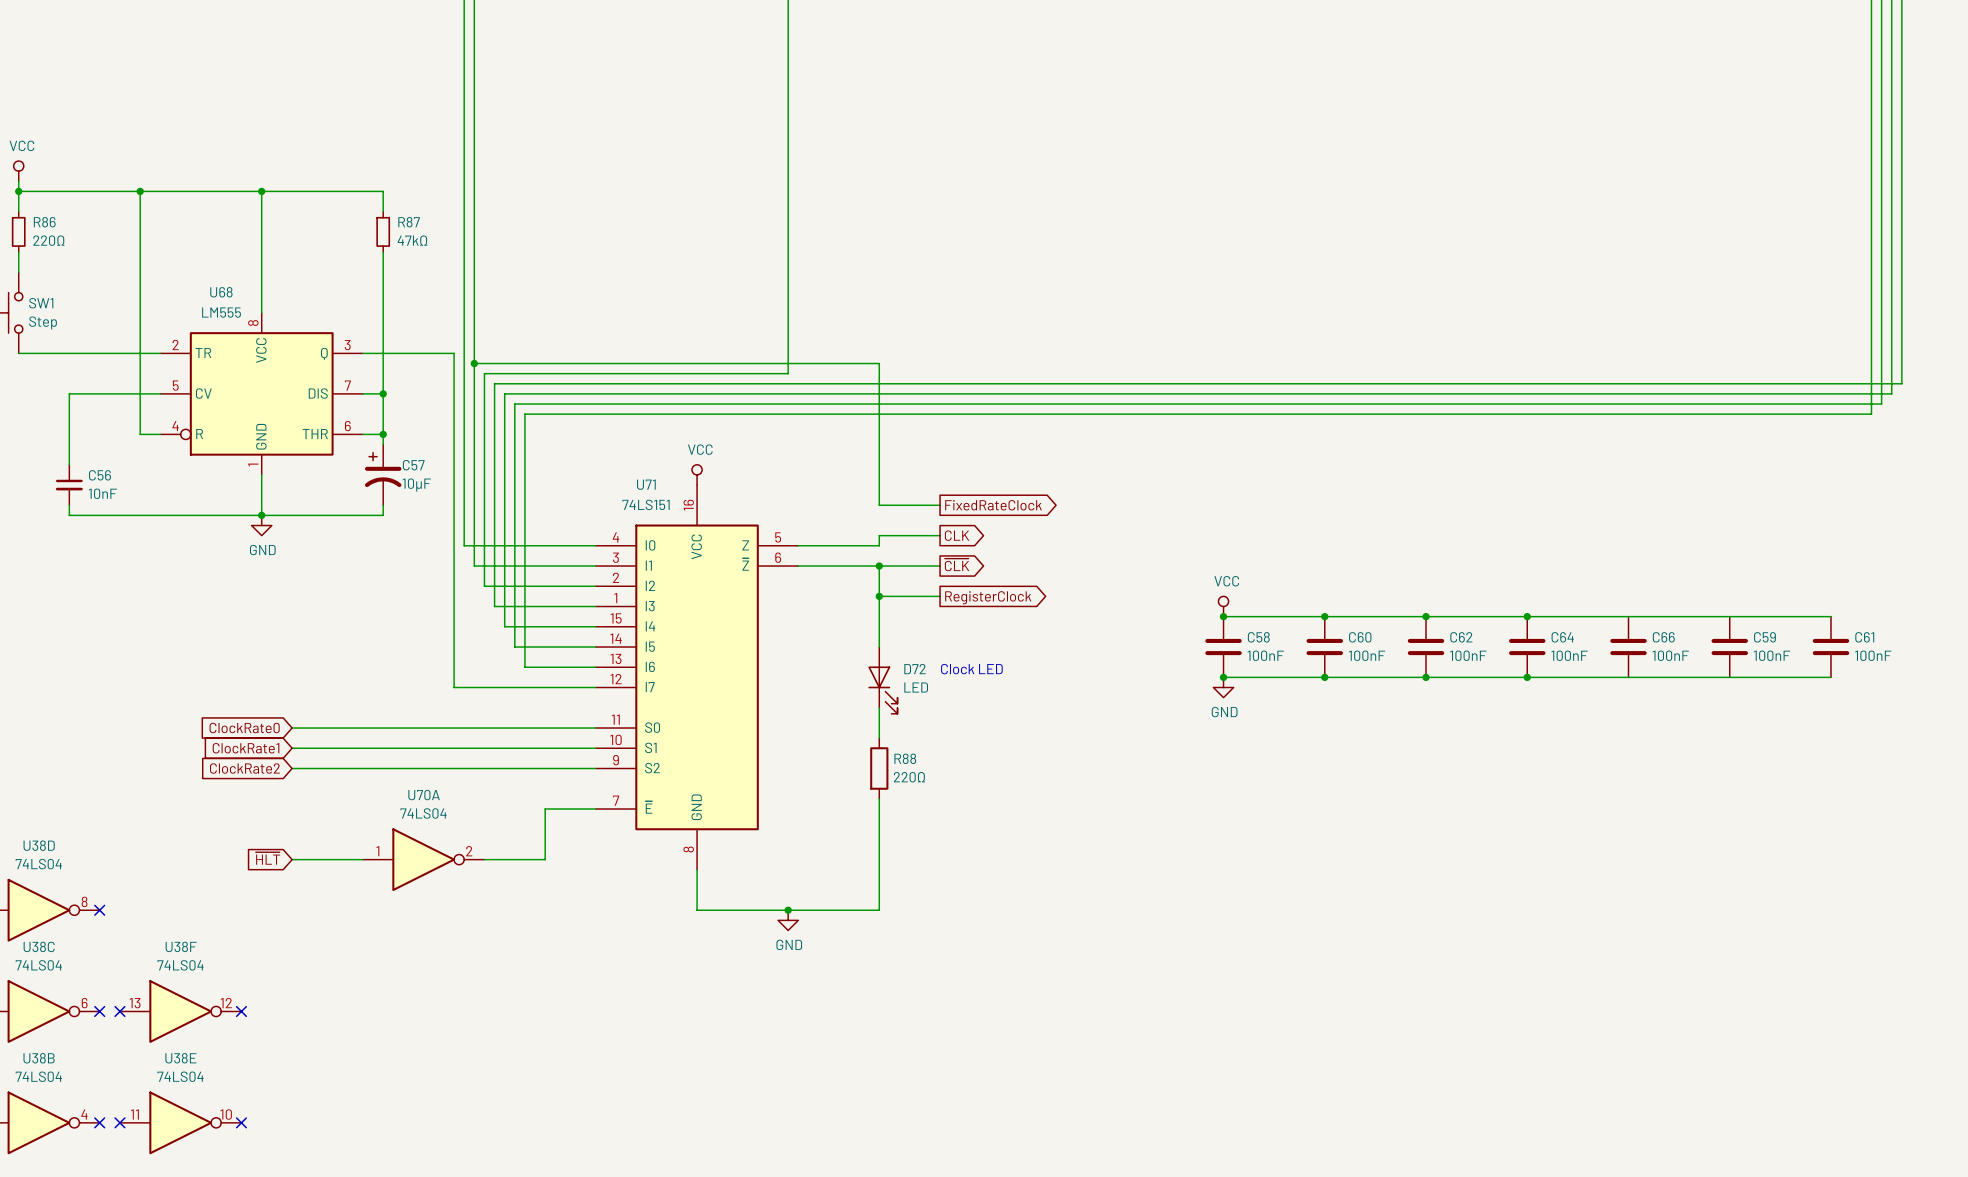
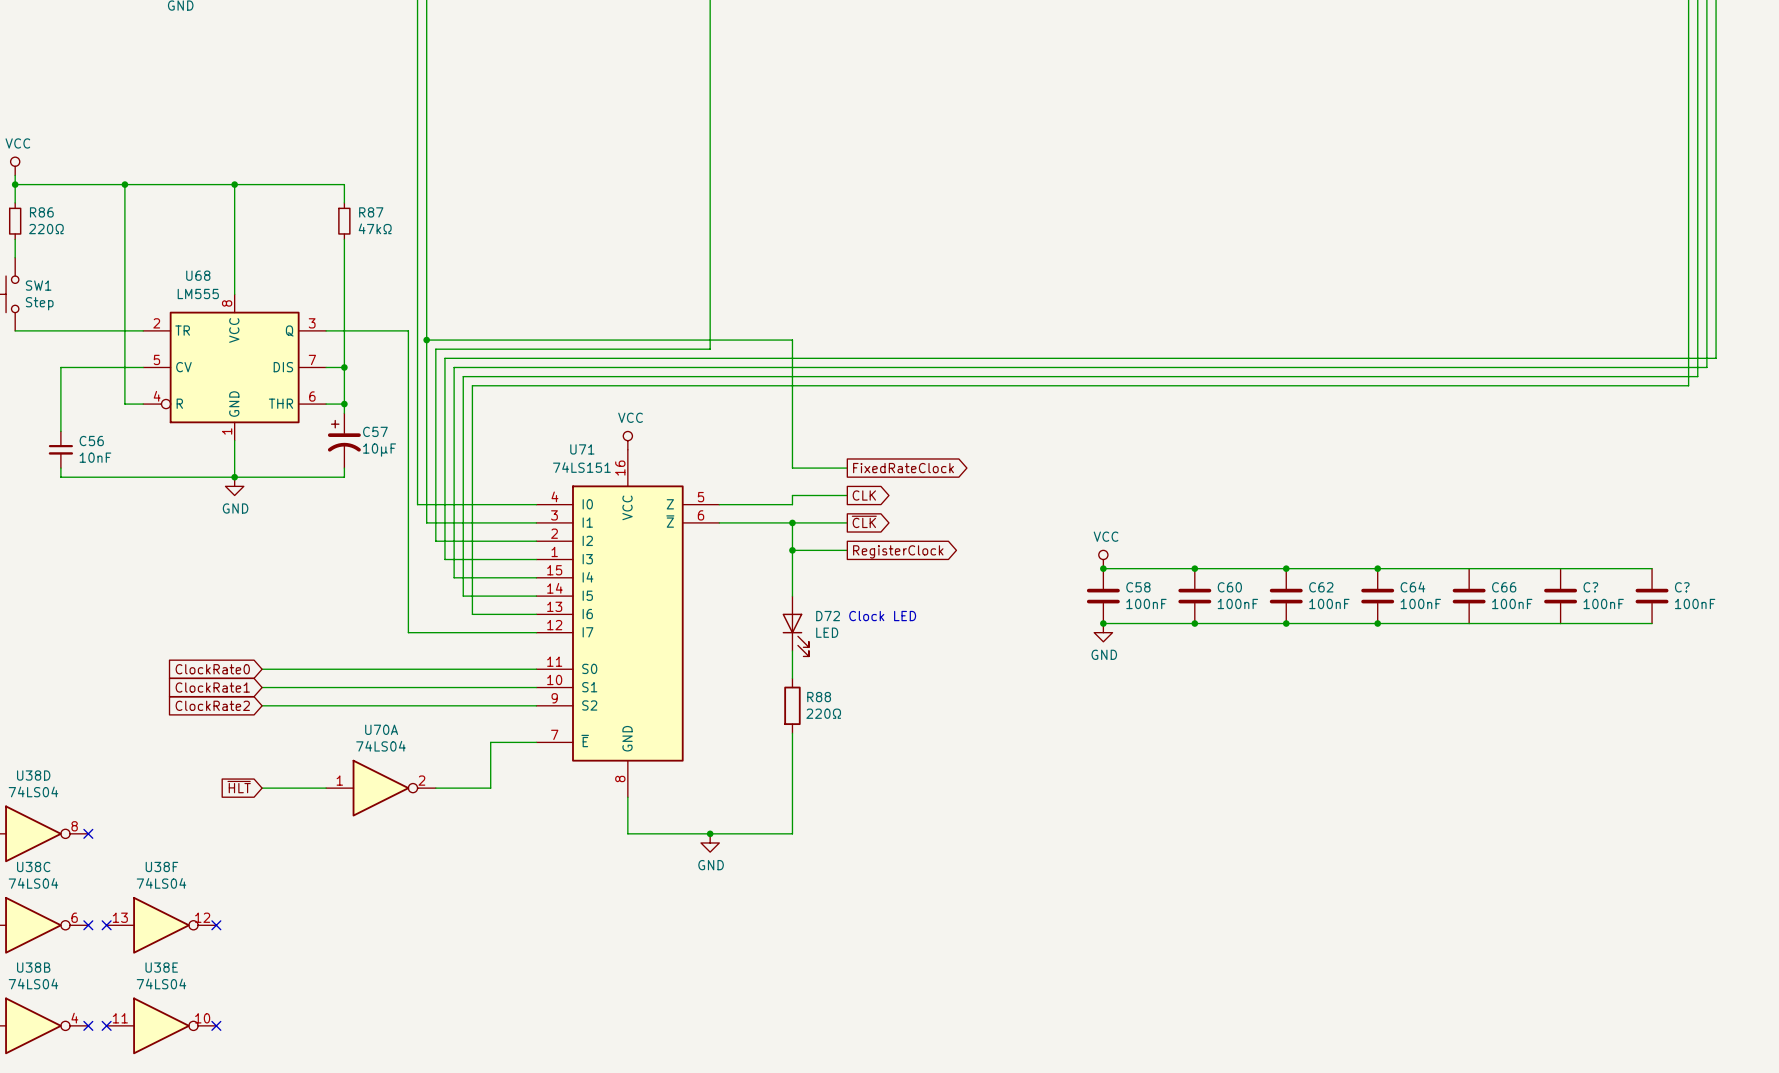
C59 name: C59 (1764, 637) -> C? (1590, 587)
C61 name: C61 (1864, 637) -> C? (1682, 587)

